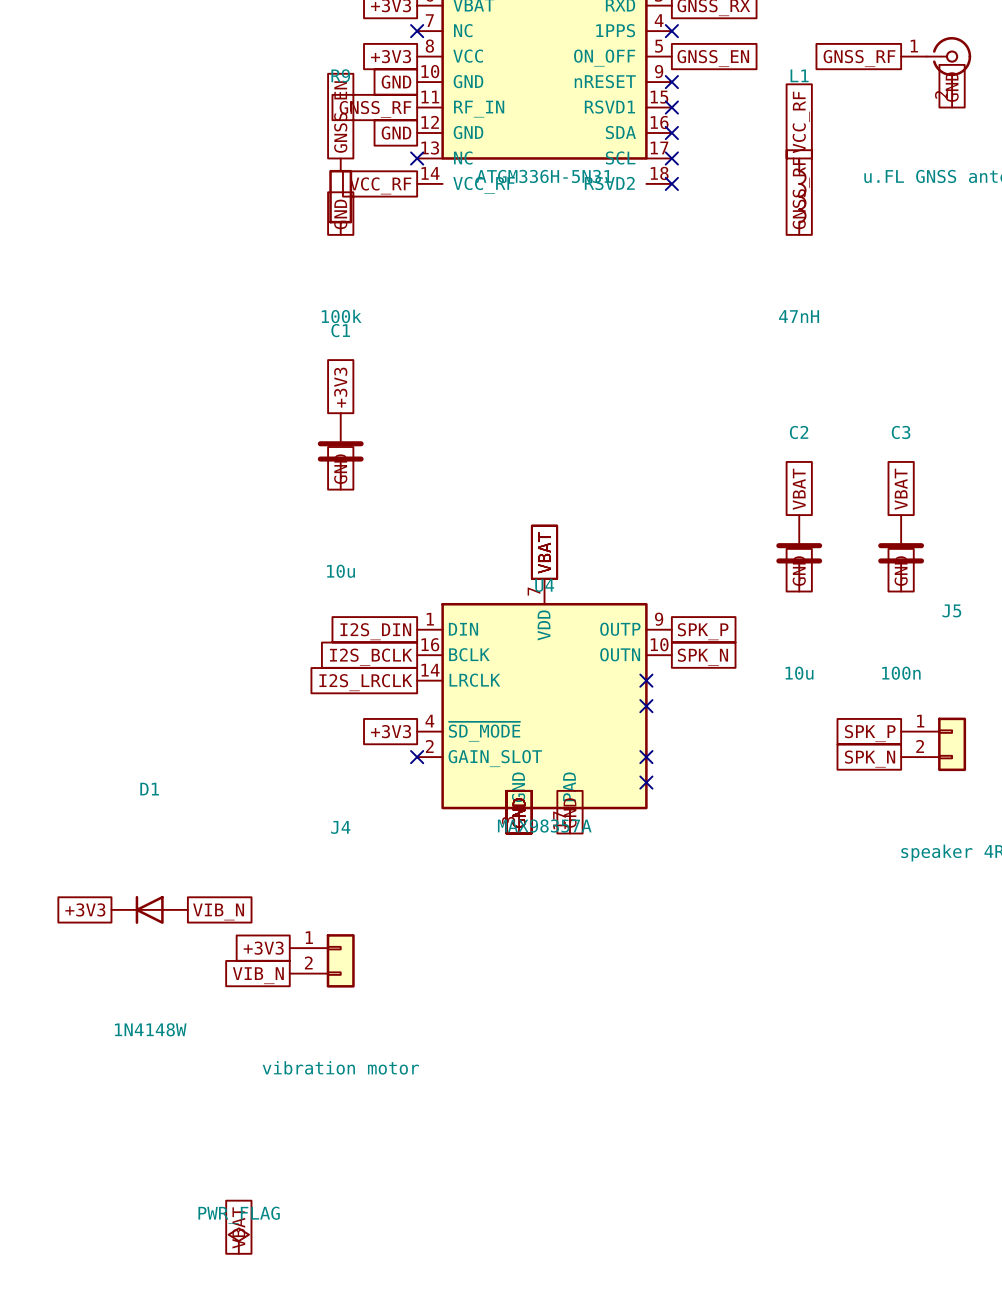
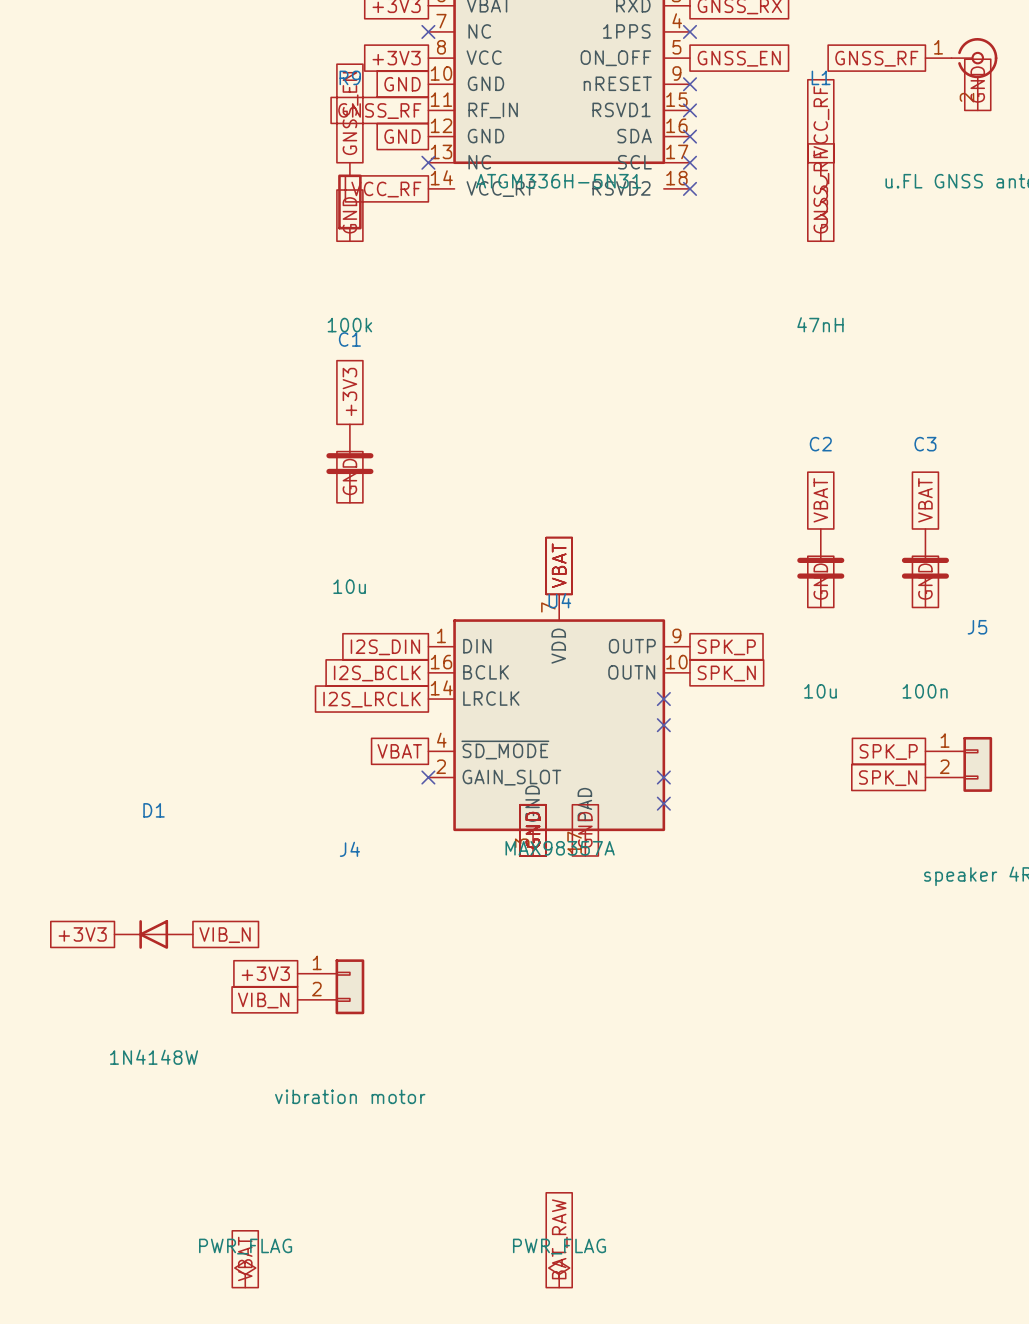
global label: +3V3 (391, 731) -> VBAT (399, 751)
global label: none -> BAT_RAW (559, 1239)
power symbol: none -> PWR_FLAG (559, 1274)

